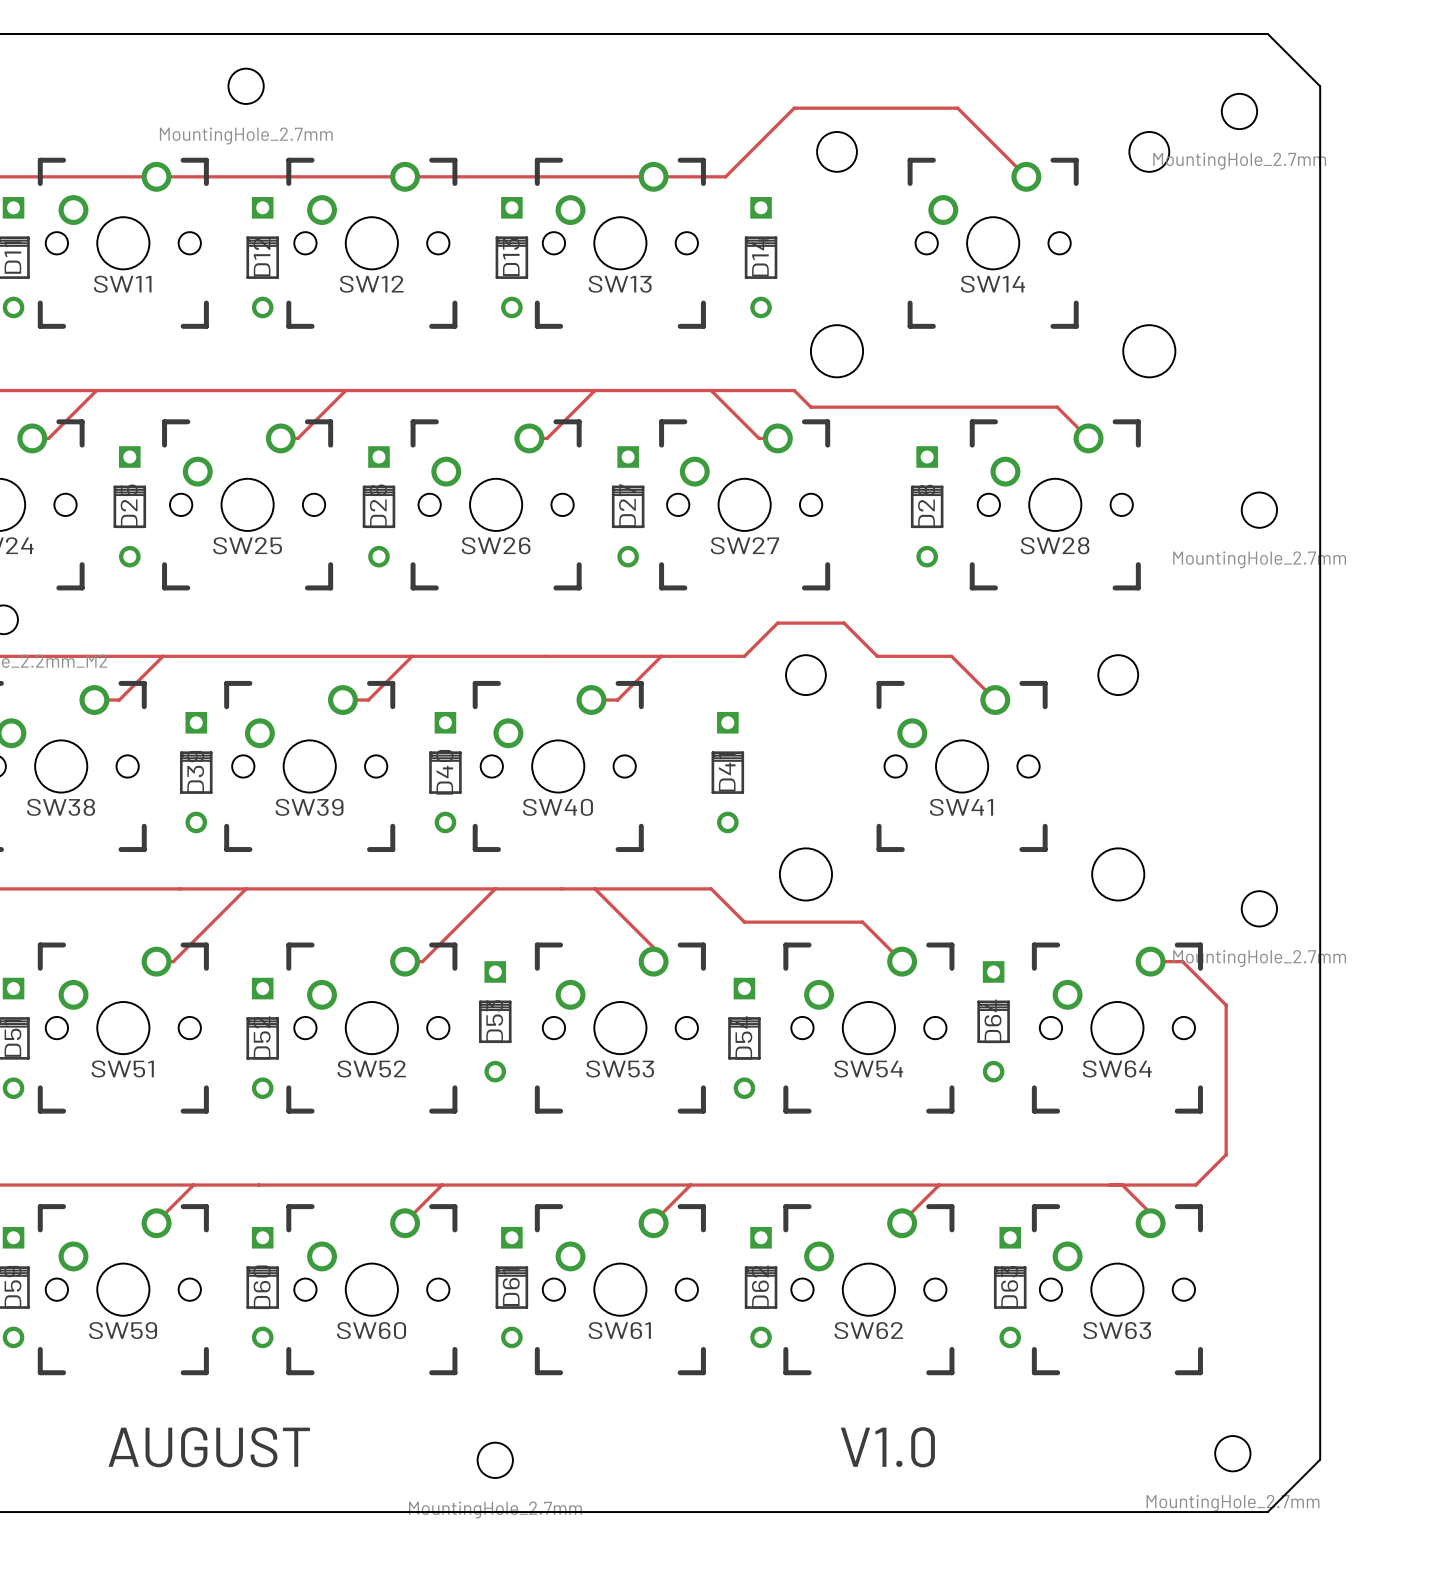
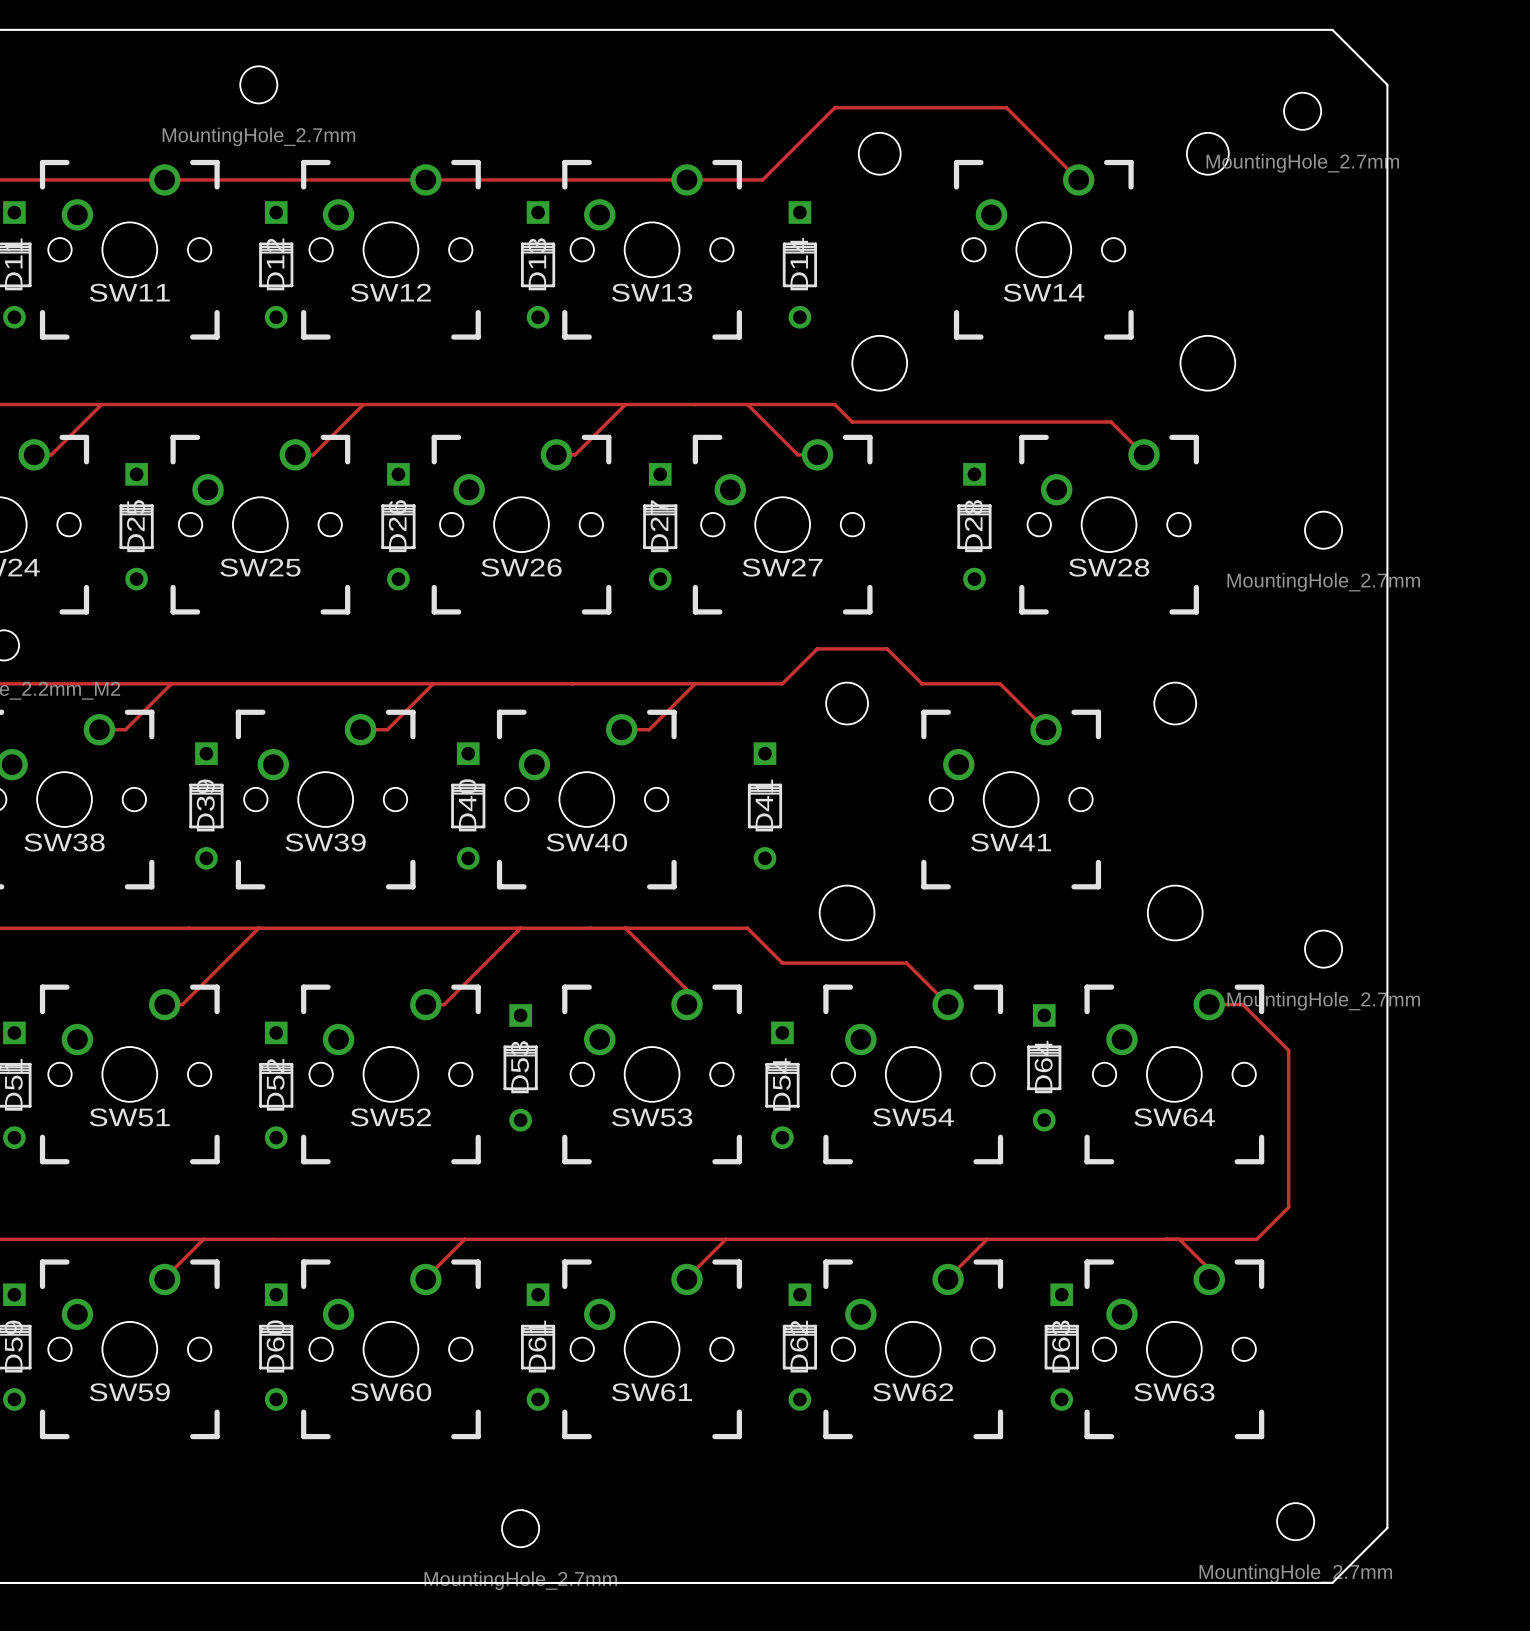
text: AUGUST (209, 1447) -> none
text: V1.0 (887, 1447) -> none

